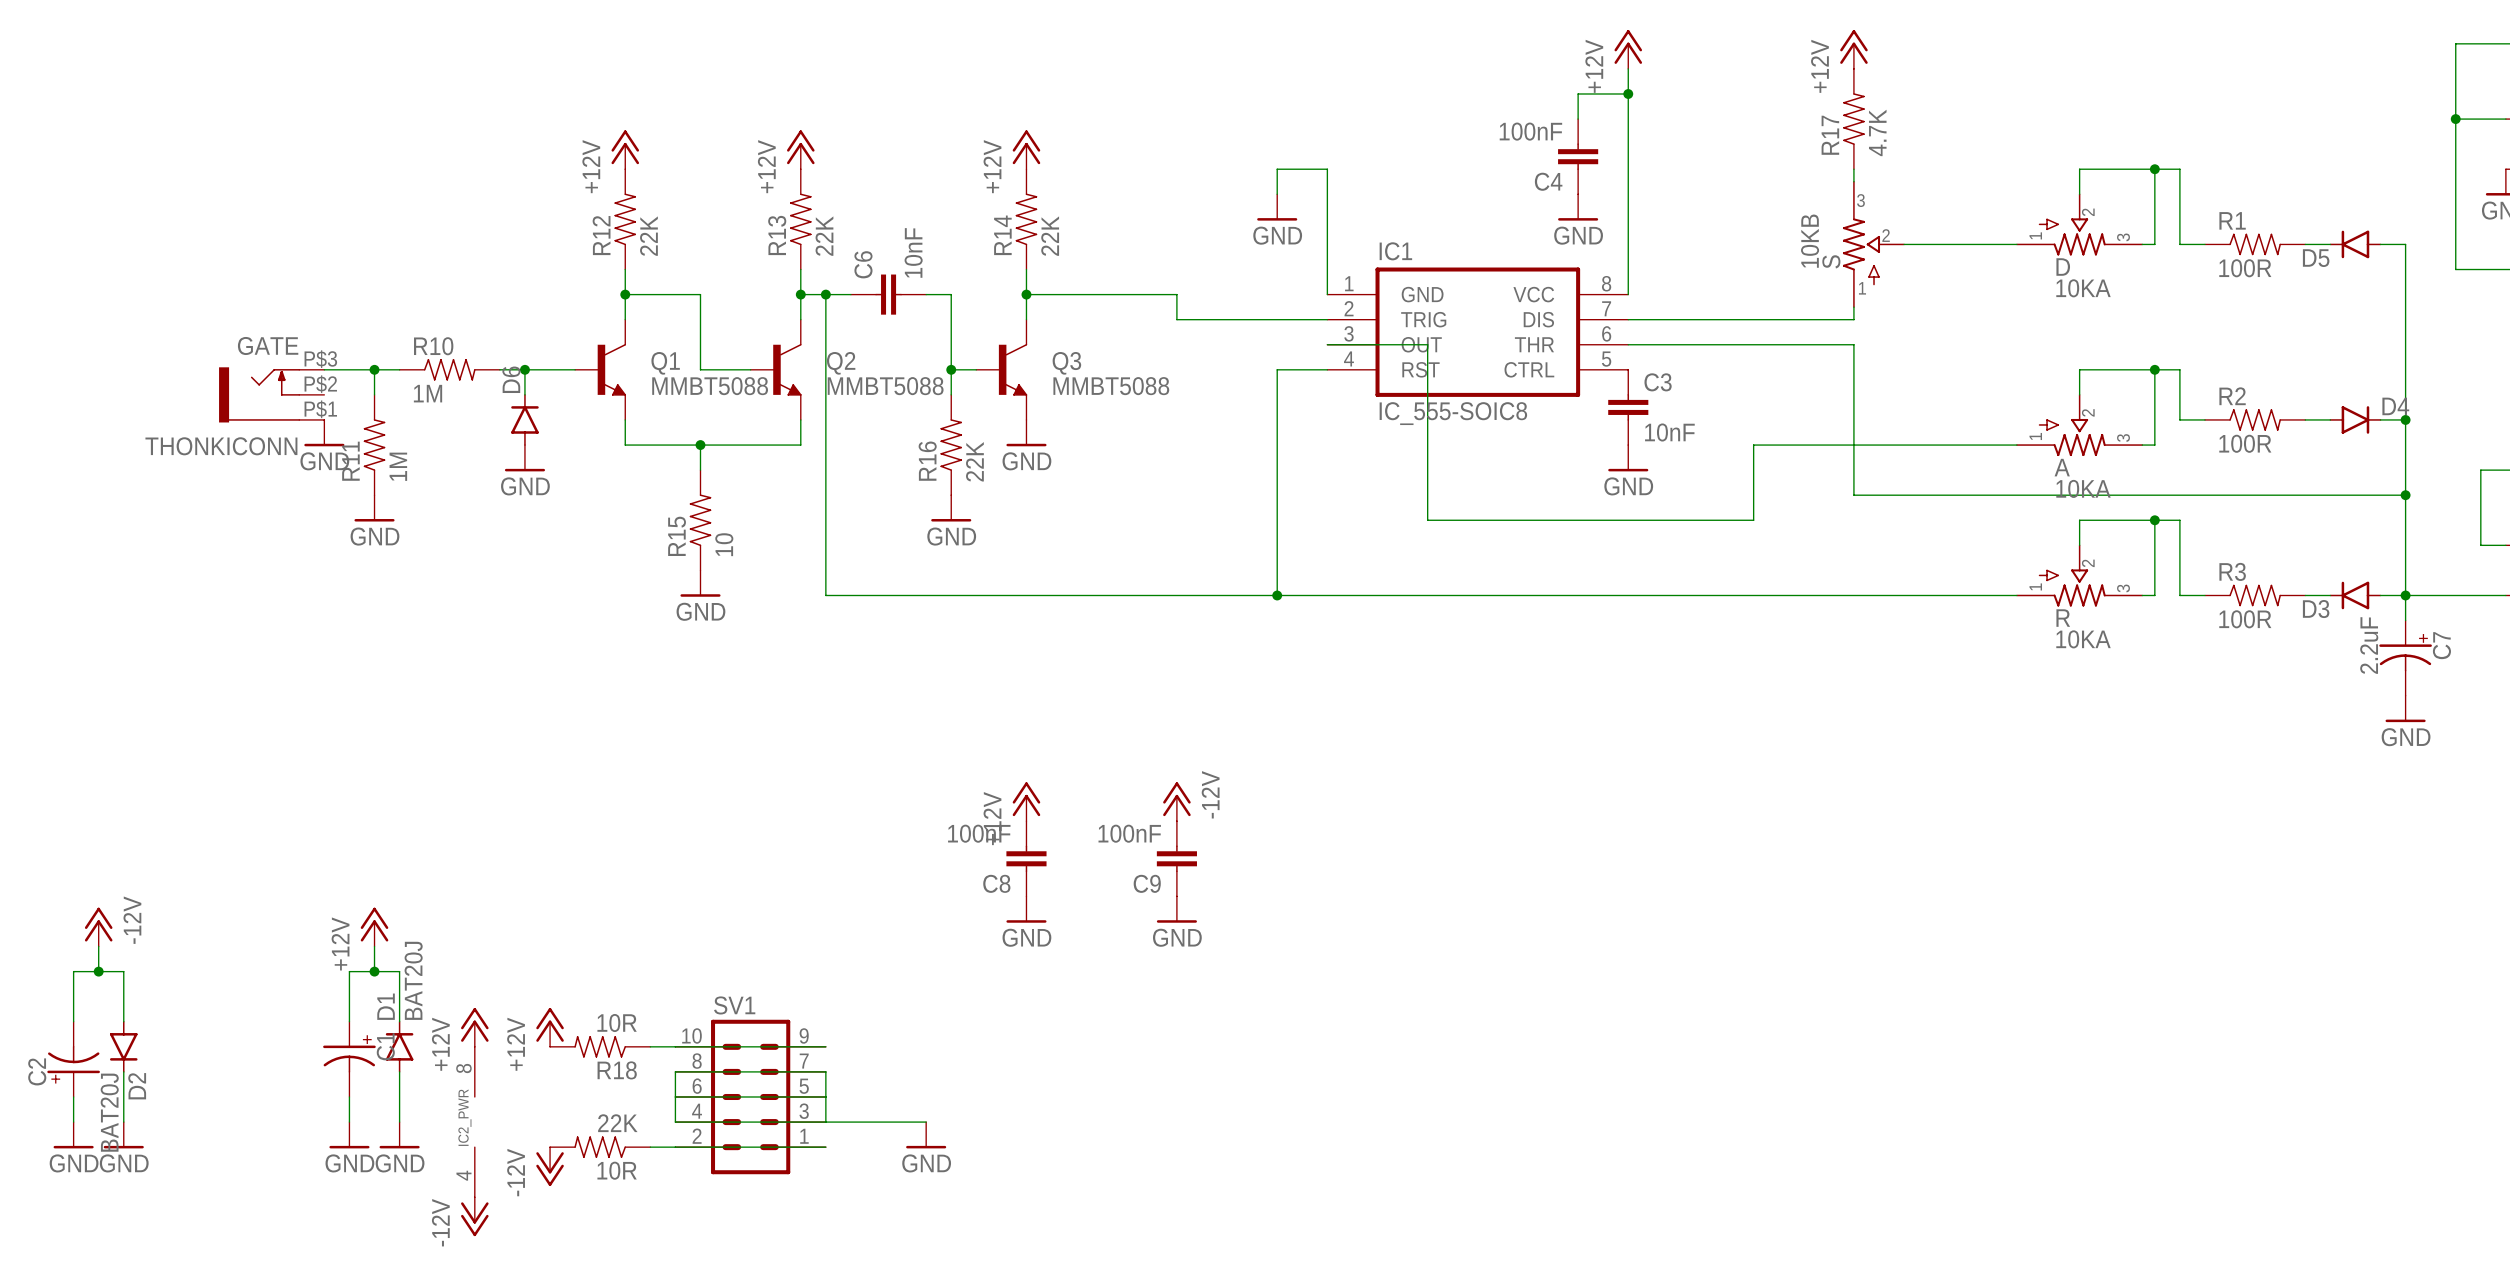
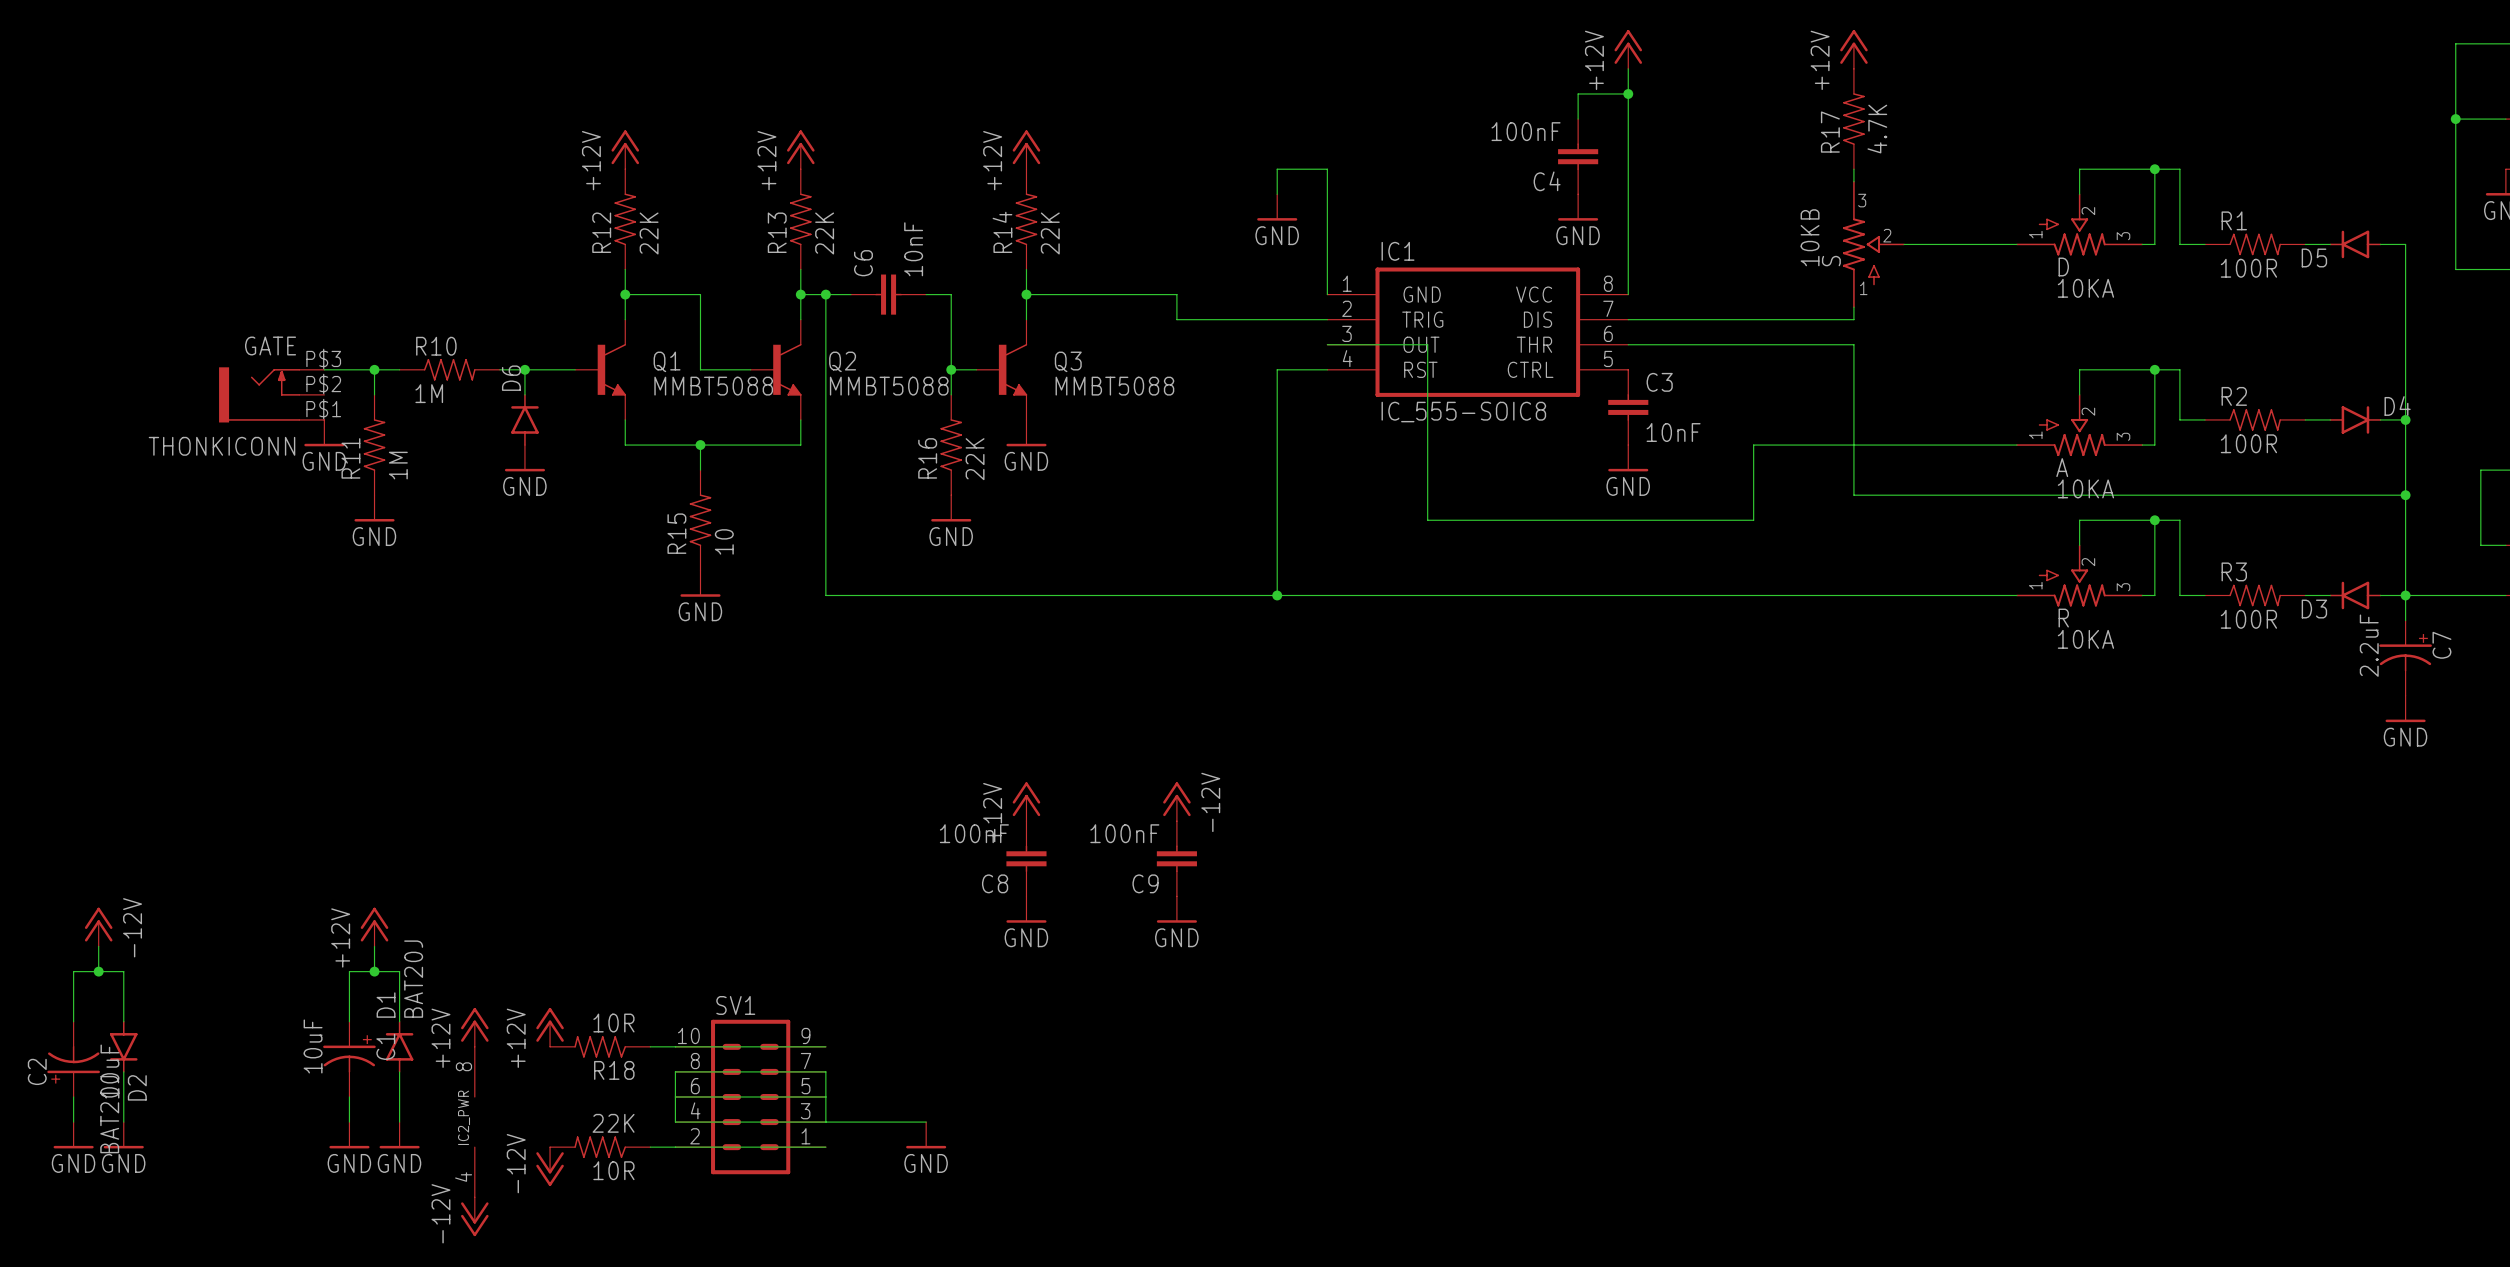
C1 value: none -> 10uF (313, 1046)
C2 value: none -> 10uF (109, 1071)

